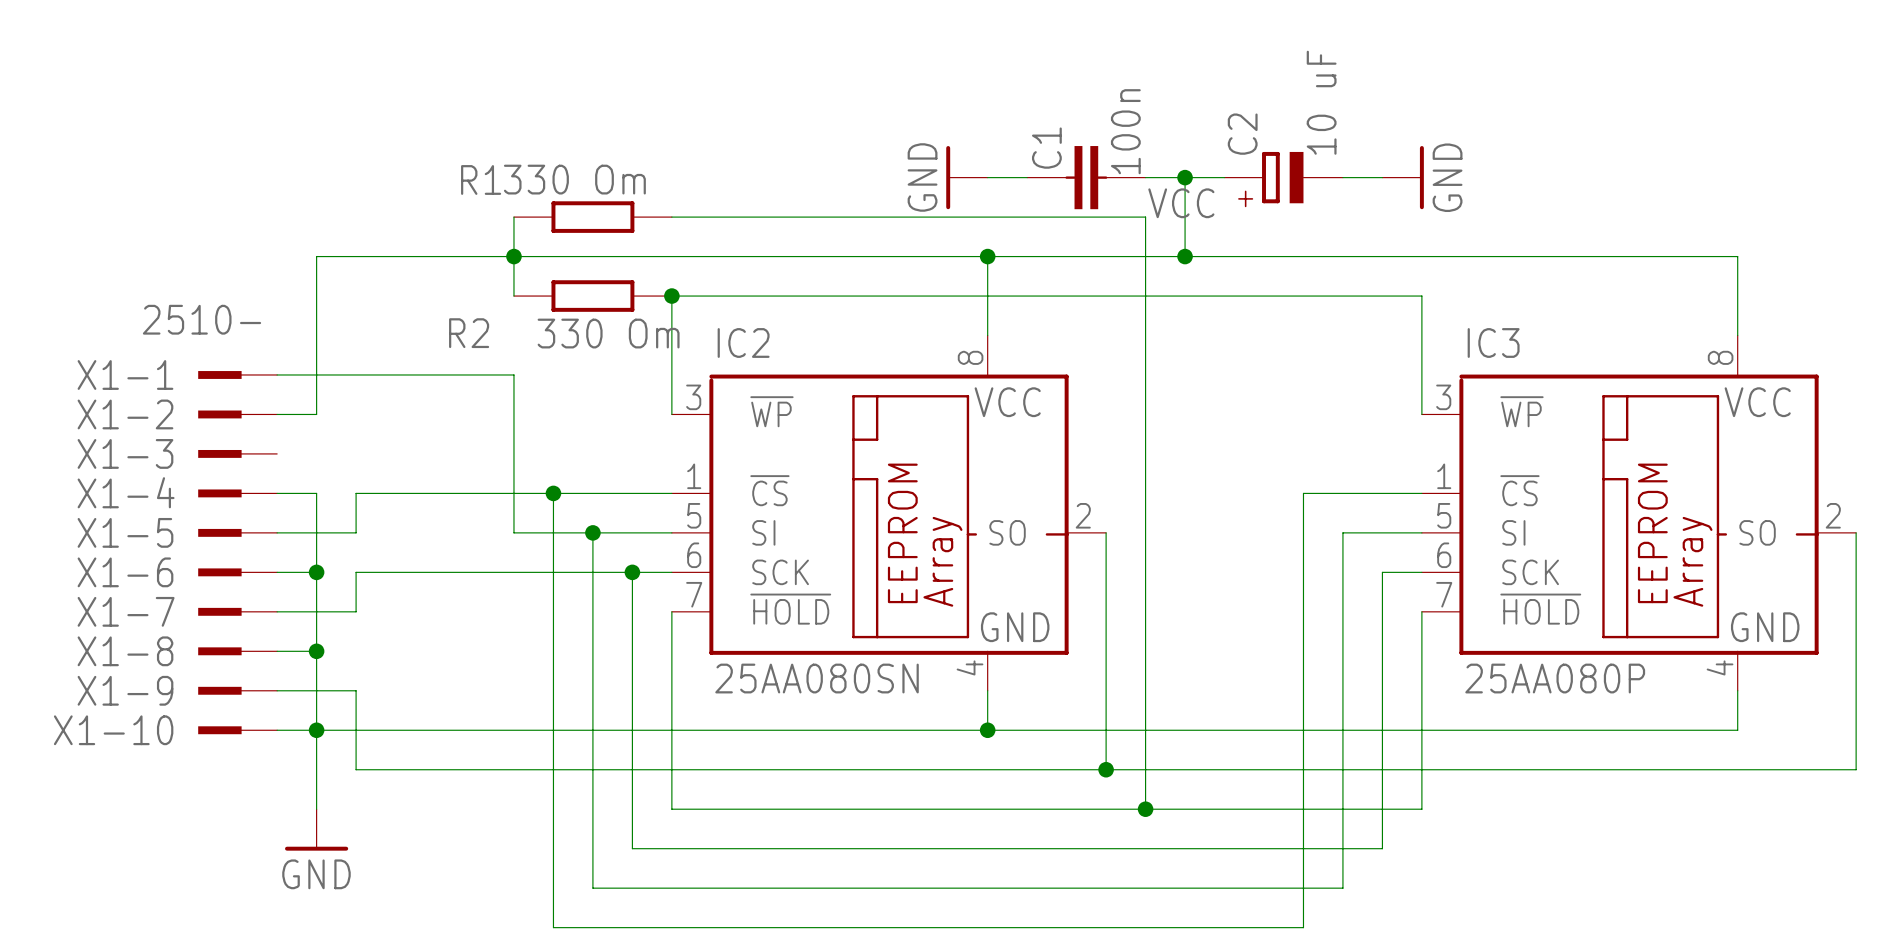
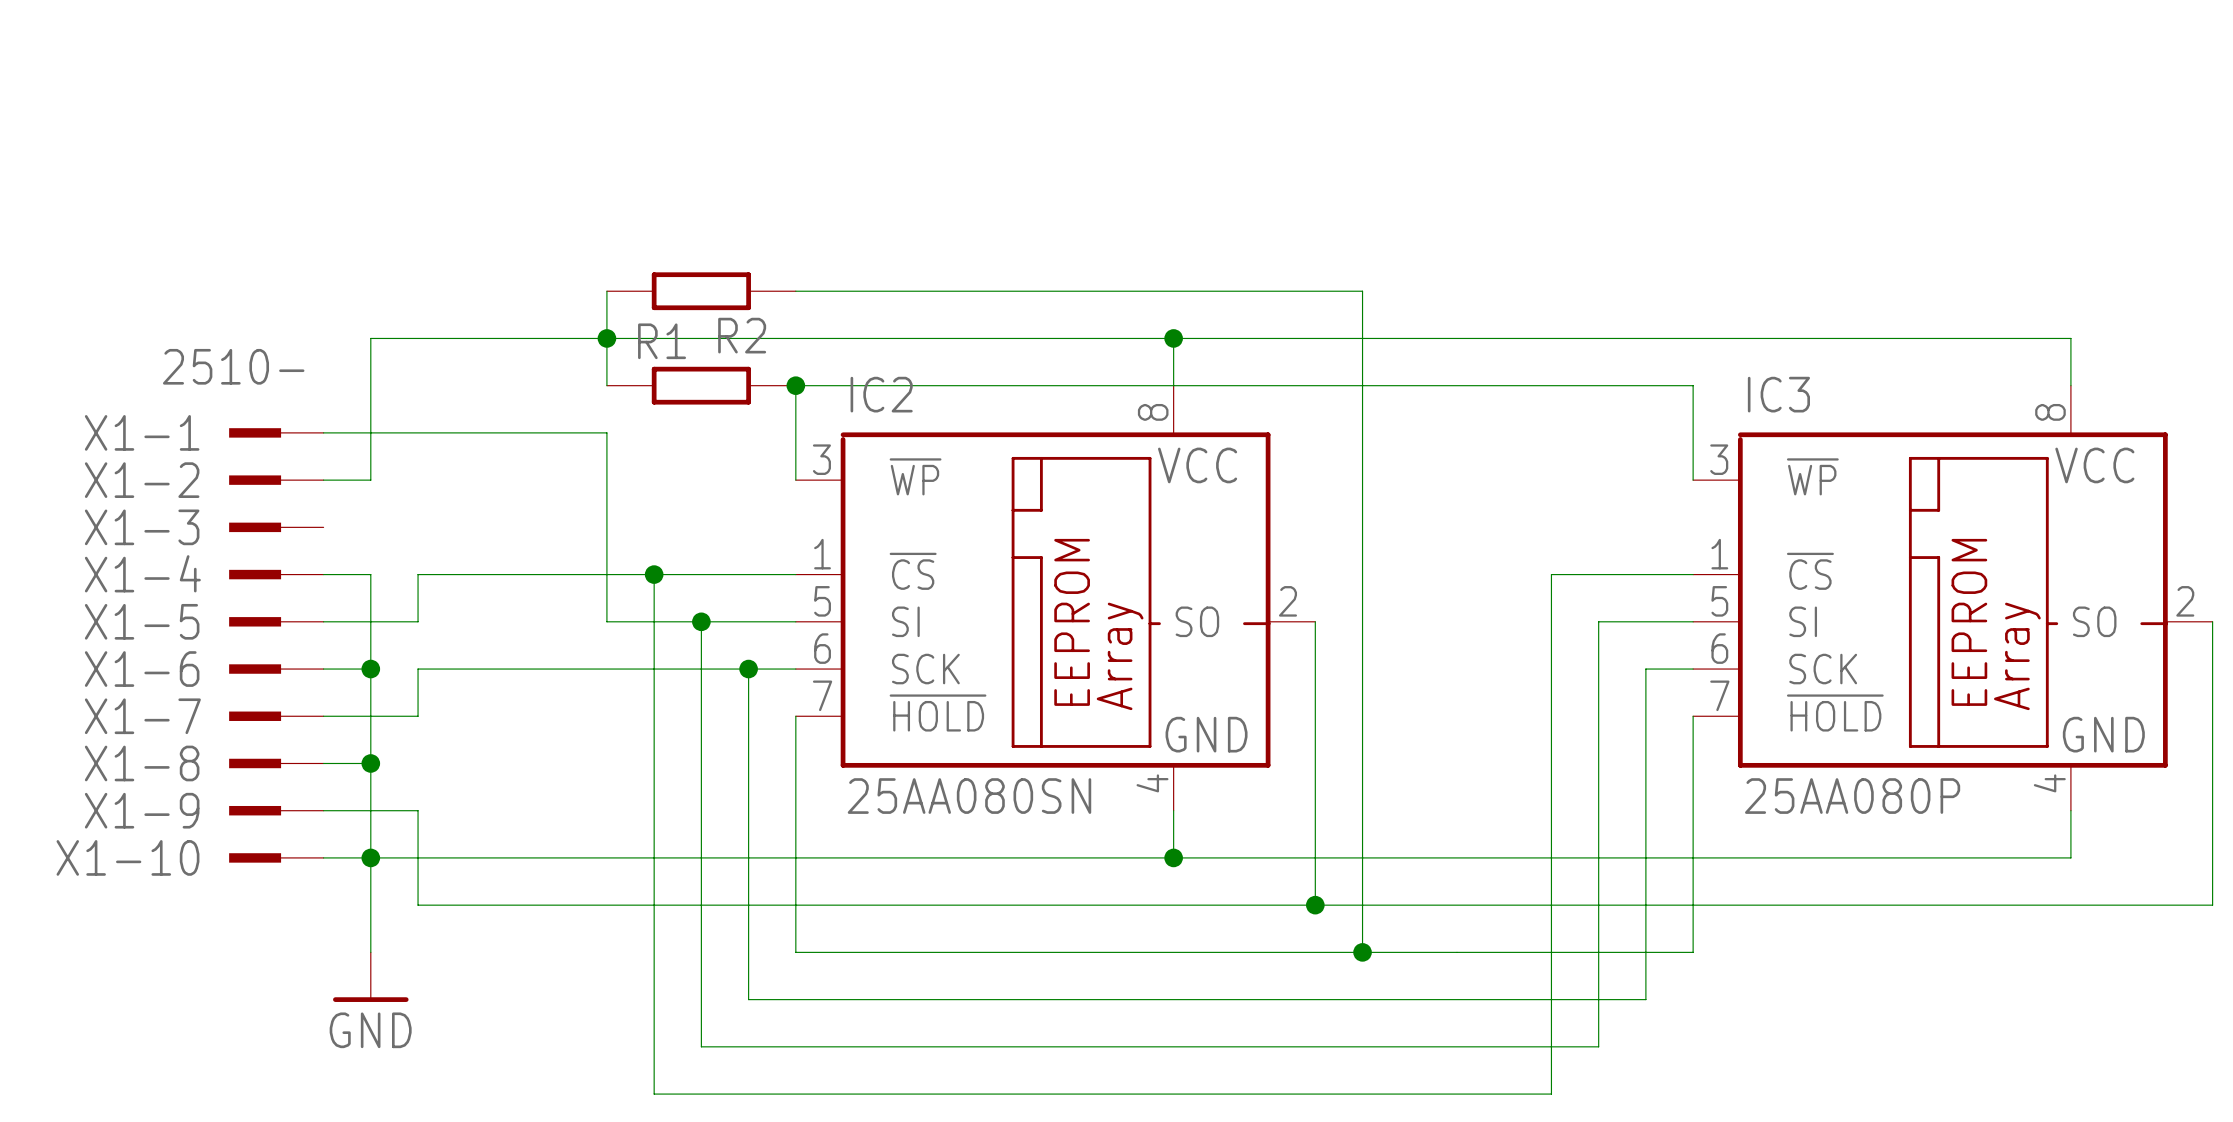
power symbol: GND (966, 177) -> none
wire: (987, 177) (1027, 177) -> none
C1: 100n (1086, 177) -> none
wire: (1145, 177) (1224, 177) -> none
wire: (1185, 177) (1185, 256) -> none
junction: (1185, 177) -> none
C2: 10 uF (1283, 177) -> none
wire: (1342, 177) (1382, 177) -> none
power symbol: GND (1403, 177) -> none
R1 name position: R1 (481, 179) -> R1 (662, 341)
R2 value: 330 Om (574, 179) -> none
label: VCC (1181, 203) -> none
wire: (513, 217) (513, 256) -> (606, 338) (606, 385)
R2 position: (592, 217) -> (701, 291)
wire: (671, 217) (1145, 217) (1145, 256) (1737, 256) (1737, 296) -> none
junction position: (513, 256) -> (606, 338)
wire: (671, 256) (316, 256) (316, 296) -> (795, 338) (370, 338)
wire: (987, 256) (987, 296) -> none
junction position: (987, 256) -> (1173, 338)
junction: (1185, 256) -> none
R1 position: (592, 296) -> (701, 385)
wire: (671, 296) (671, 335) -> (1693, 385) (795, 385)
junction position: (671, 296) -> (795, 385)
wire: (1421, 296) (1421, 335) -> (1693, 338) (2070, 338)
R2 name position: R2 (469, 333) -> R2 (742, 335)
R1 value: 330 Om (608, 333) -> none

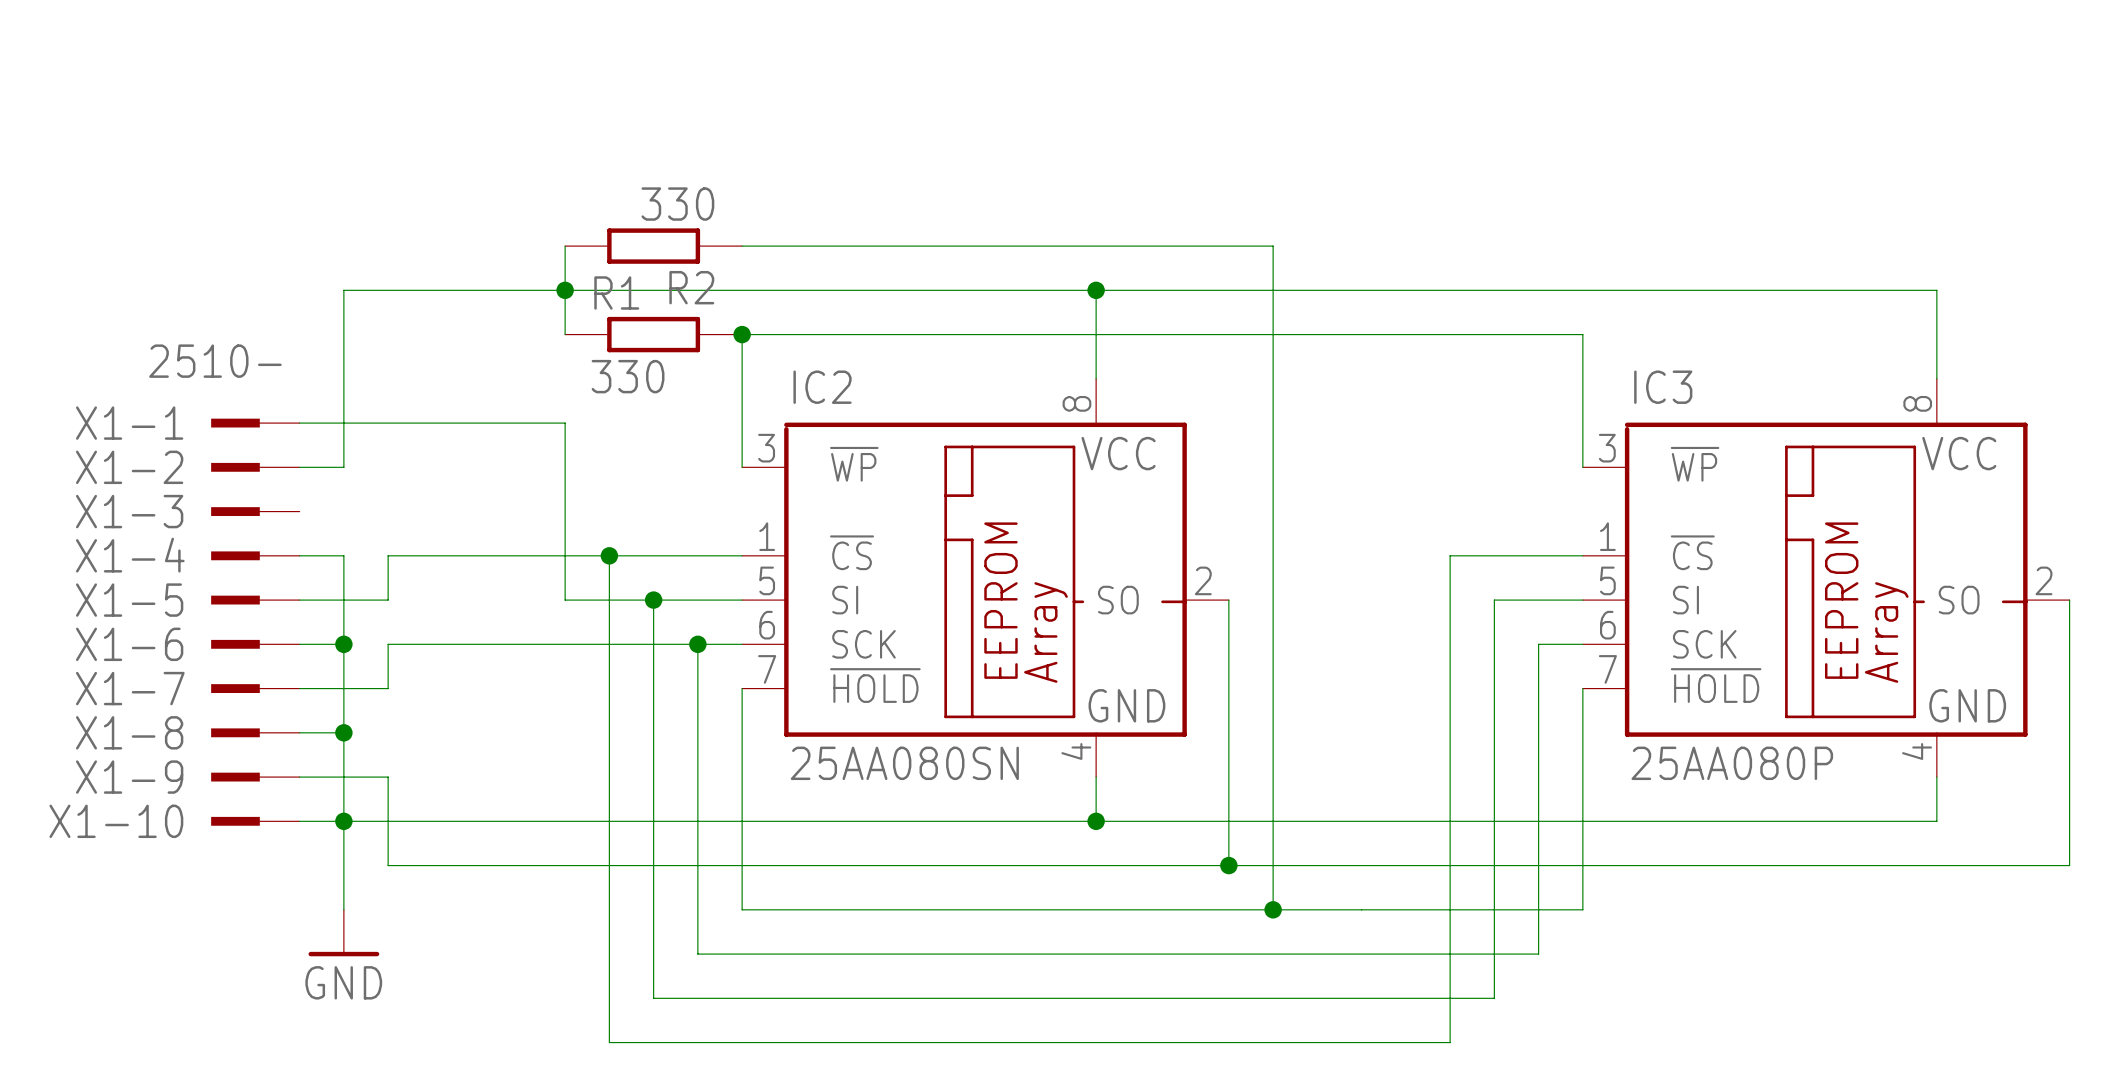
R2 value: none -> 330 (677, 204)
wire: none -> (742, 246) (1273, 246) (1273, 290) (1936, 290) (1936, 334)
R2 position: (701, 291) -> (653, 246)
wire: none -> (1096, 290) (1096, 334)
wire: (370, 338) (795, 338) -> (343, 334) (343, 290) (742, 290)
wire: (606, 338) (606, 385) -> (565, 246) (565, 290)
junction position: (606, 338) -> (565, 290)
junction position: (1173, 338) -> (1096, 290)
wire: (1693, 338) (2070, 338) -> (1582, 334) (1582, 378)
R1 value: none -> 330 (628, 376)
R1 position: (701, 385) -> (653, 334)
wire: (795, 385) (1693, 385) -> (742, 378) (742, 334)
junction position: (795, 385) -> (742, 334)

